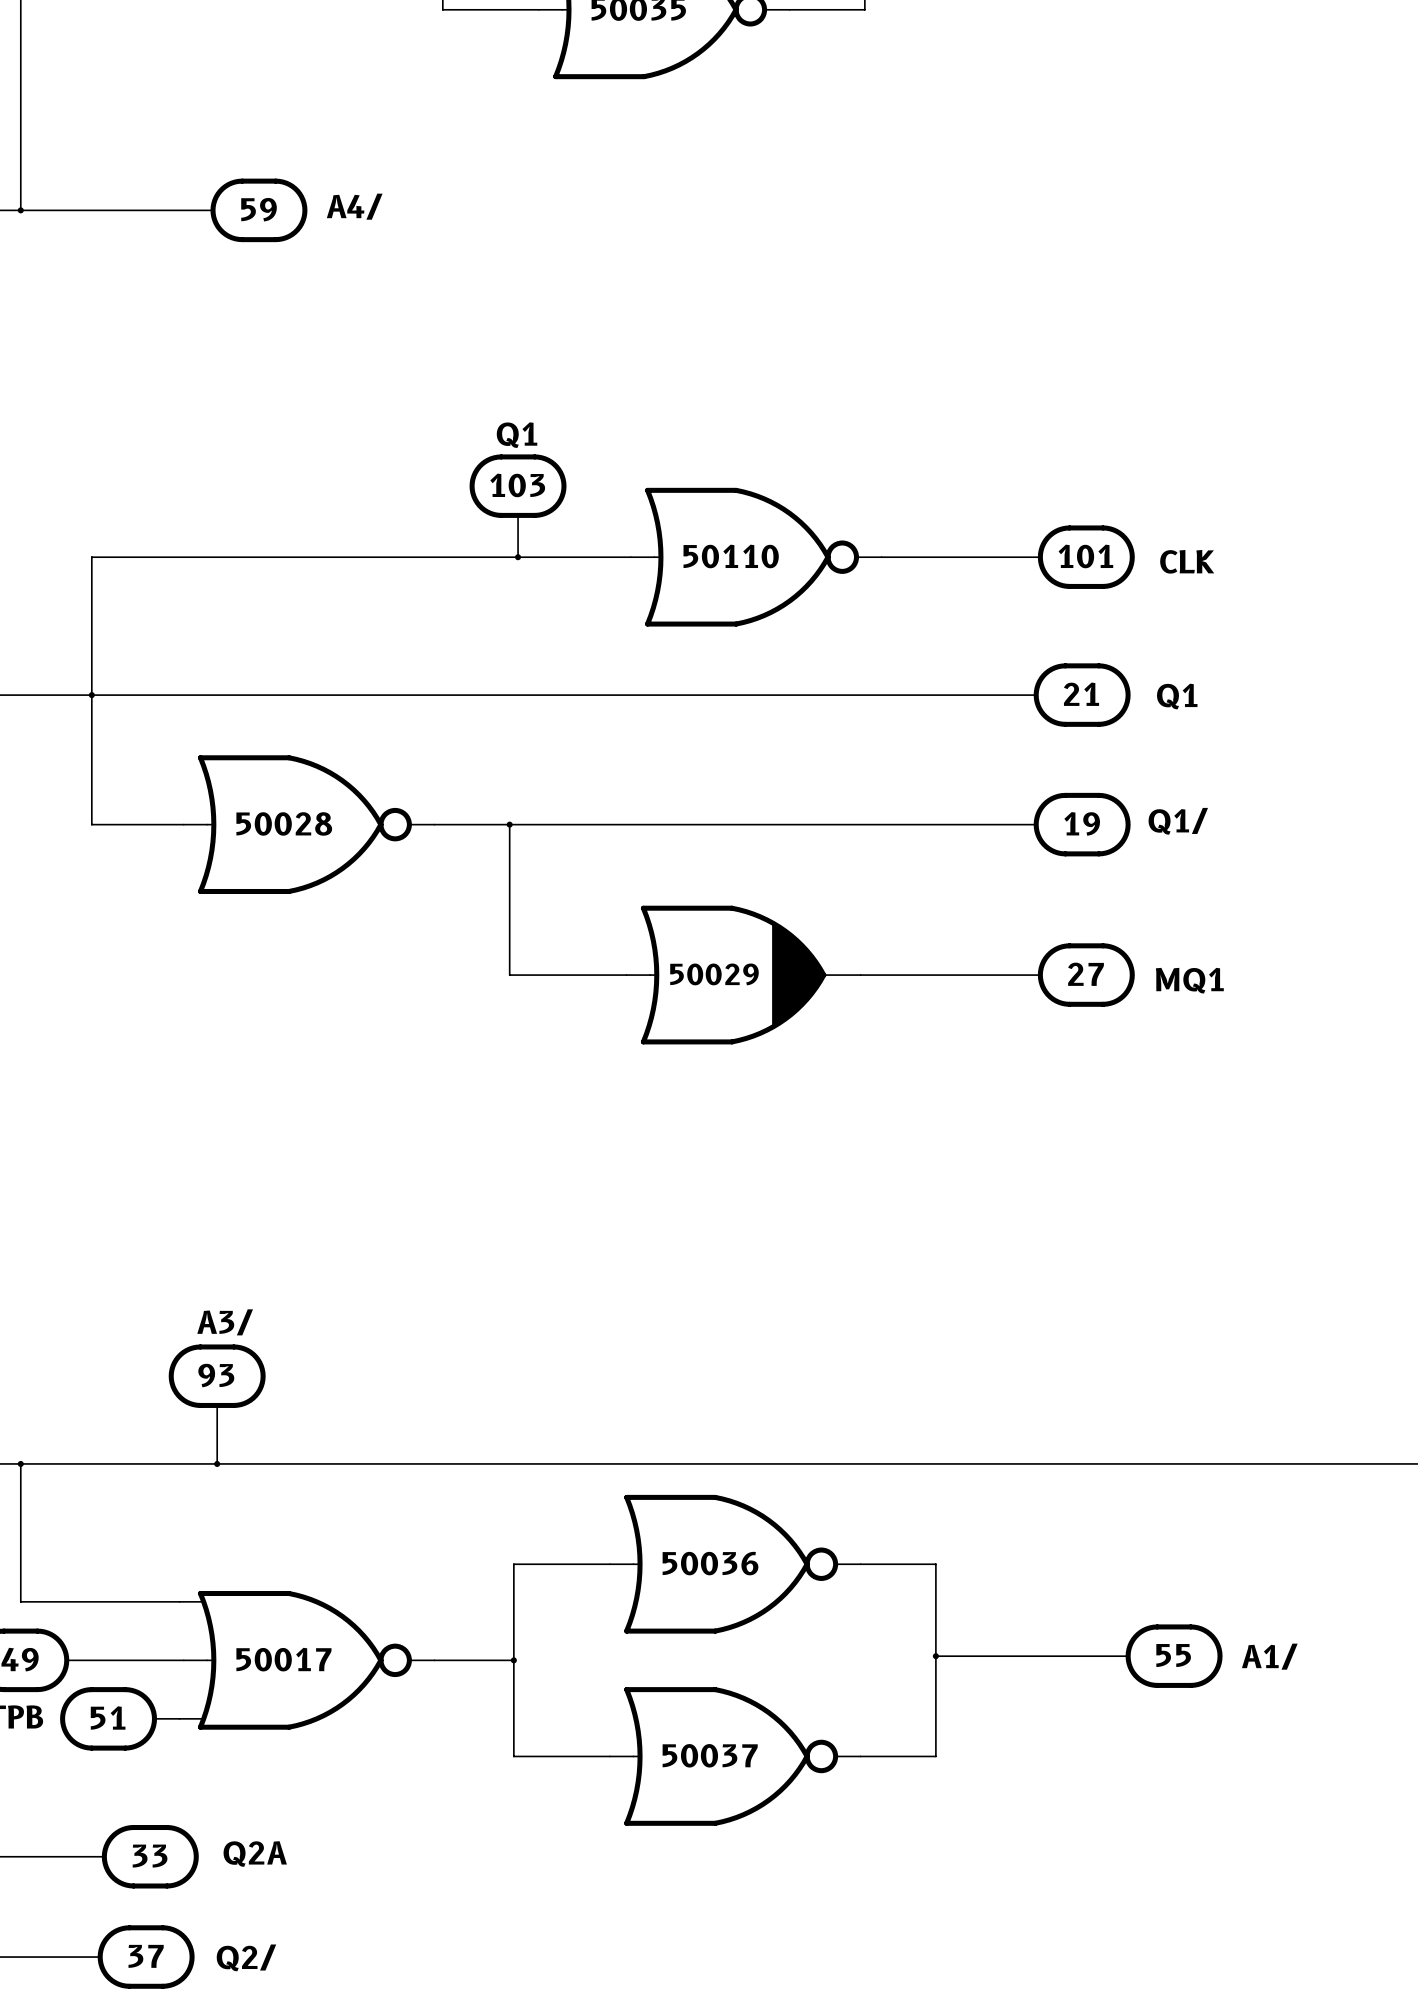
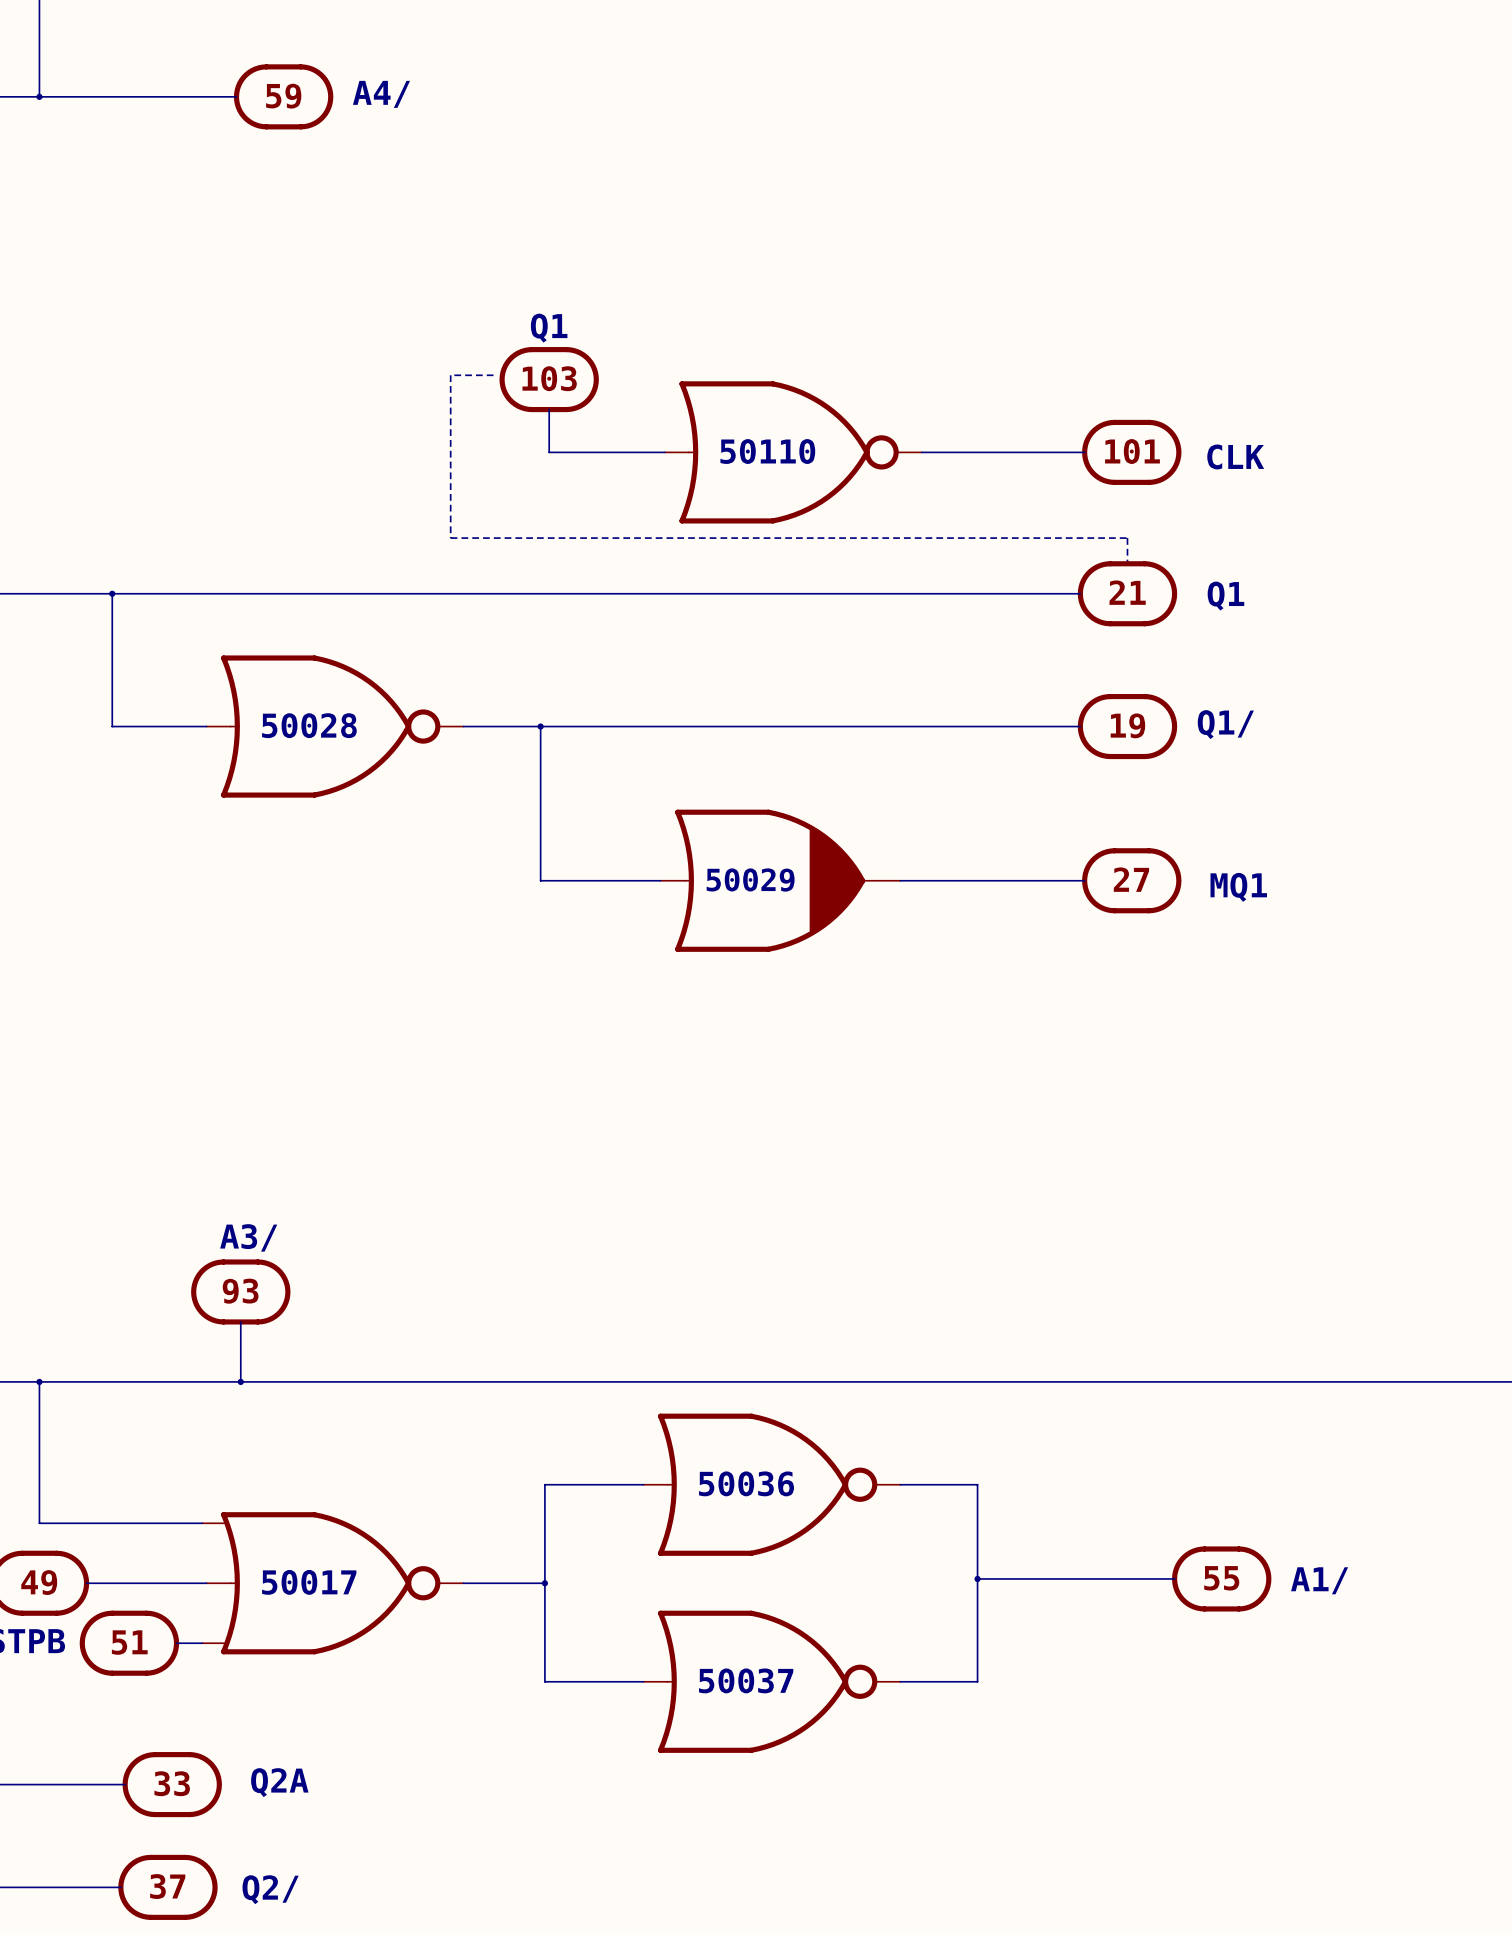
line: none -> (493, 375) (450, 375) (450, 538) (1127, 538) (1127, 563)
wire: (518, 557) (91, 557) (91, 695) -> none
junction: (518, 557) -> none

